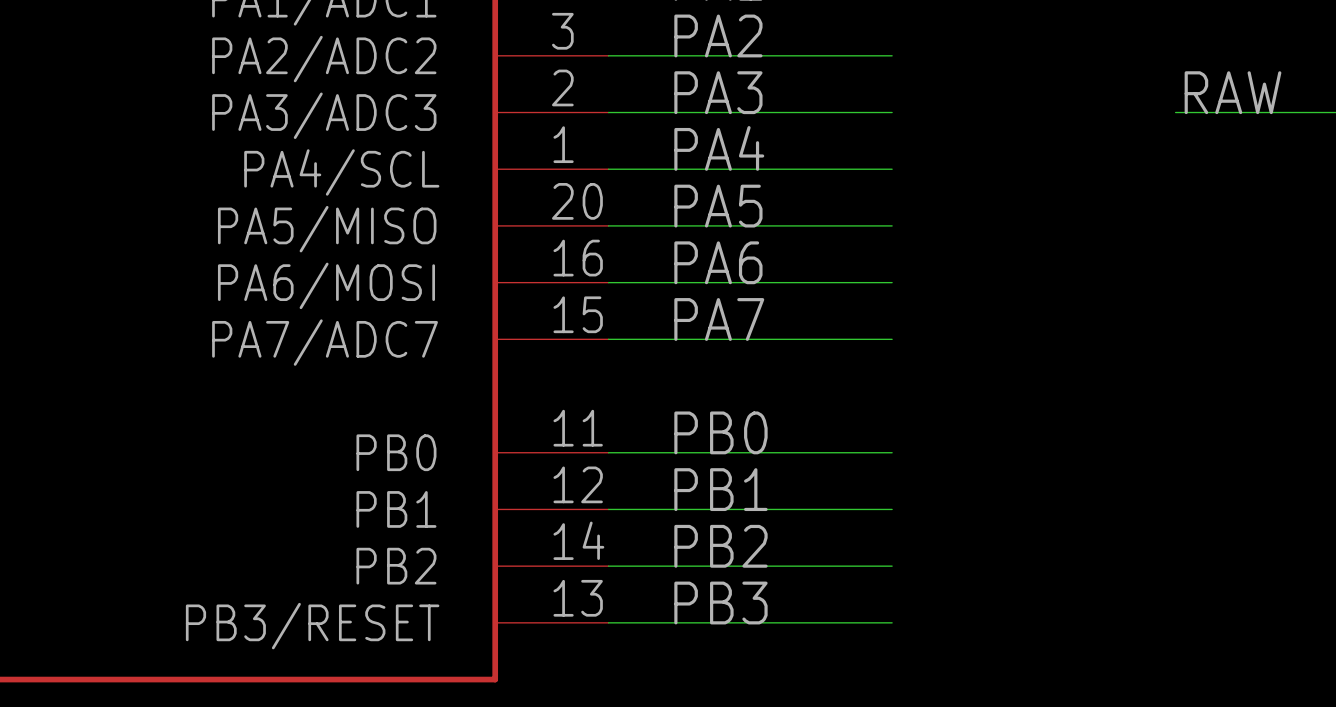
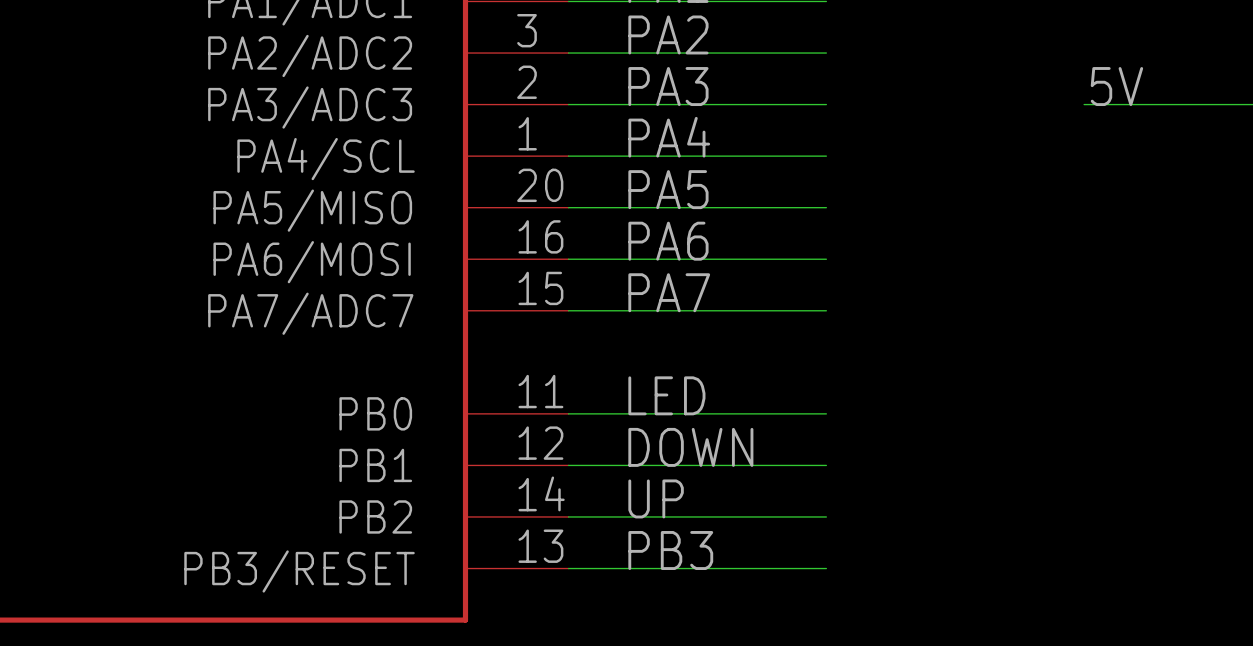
label: RAW (1233, 92) -> 5V (1116, 86)
label: PB0 (720, 432) -> LED (666, 395)
label: PB1 (720, 489) -> DOWN (690, 447)
label: PB2 (720, 546) -> UP (656, 498)

